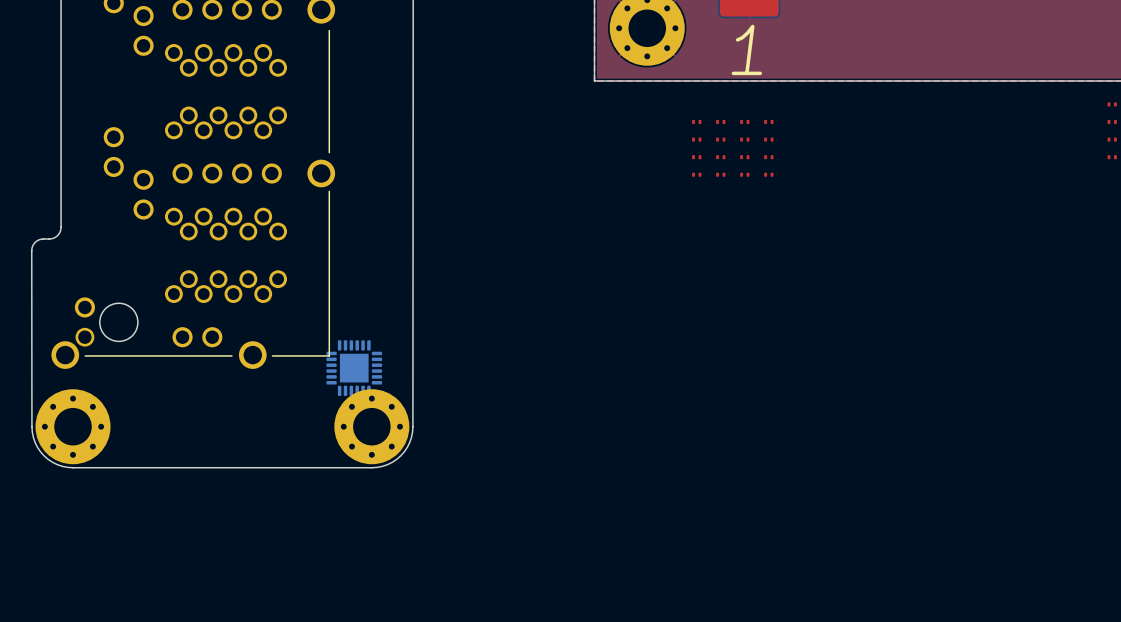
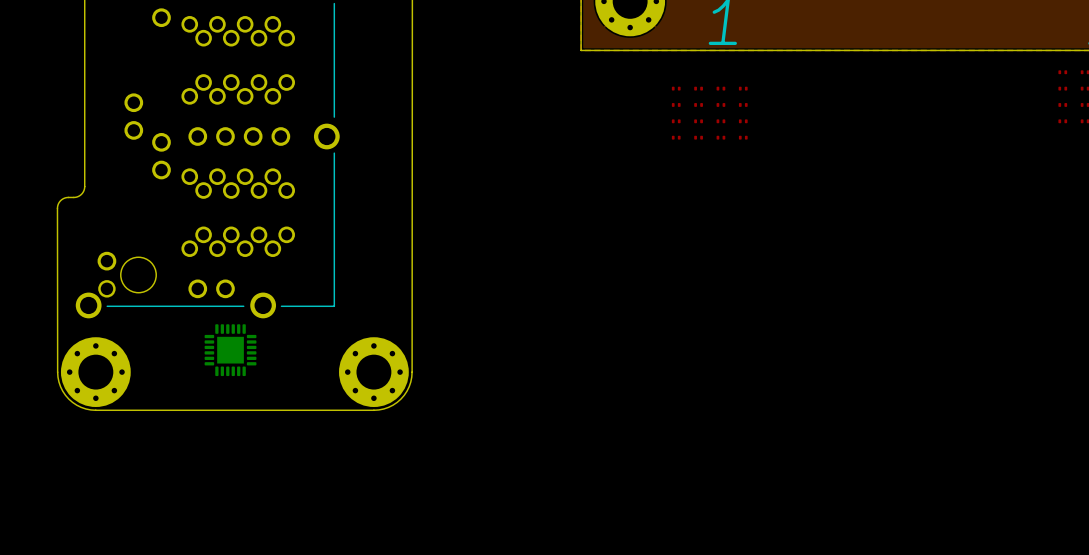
part position: (354, 368) -> (230, 350)

